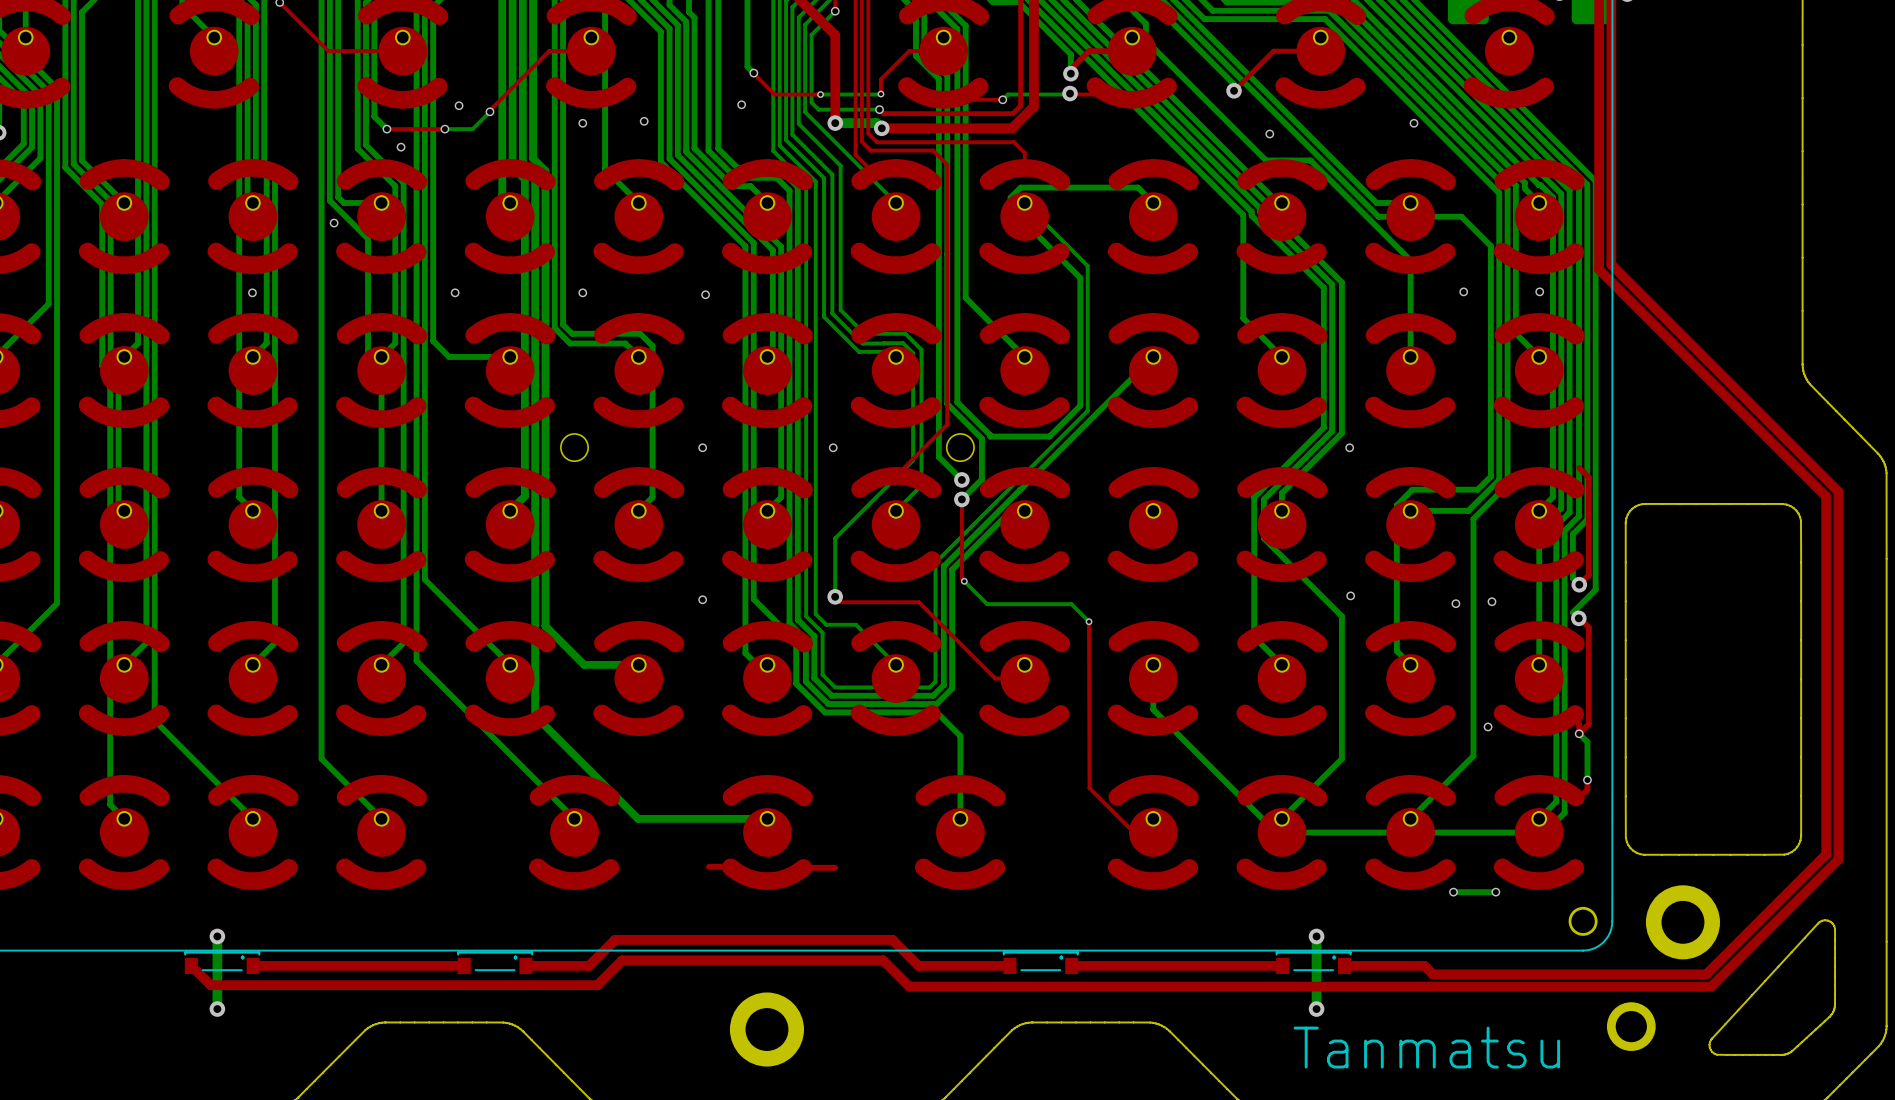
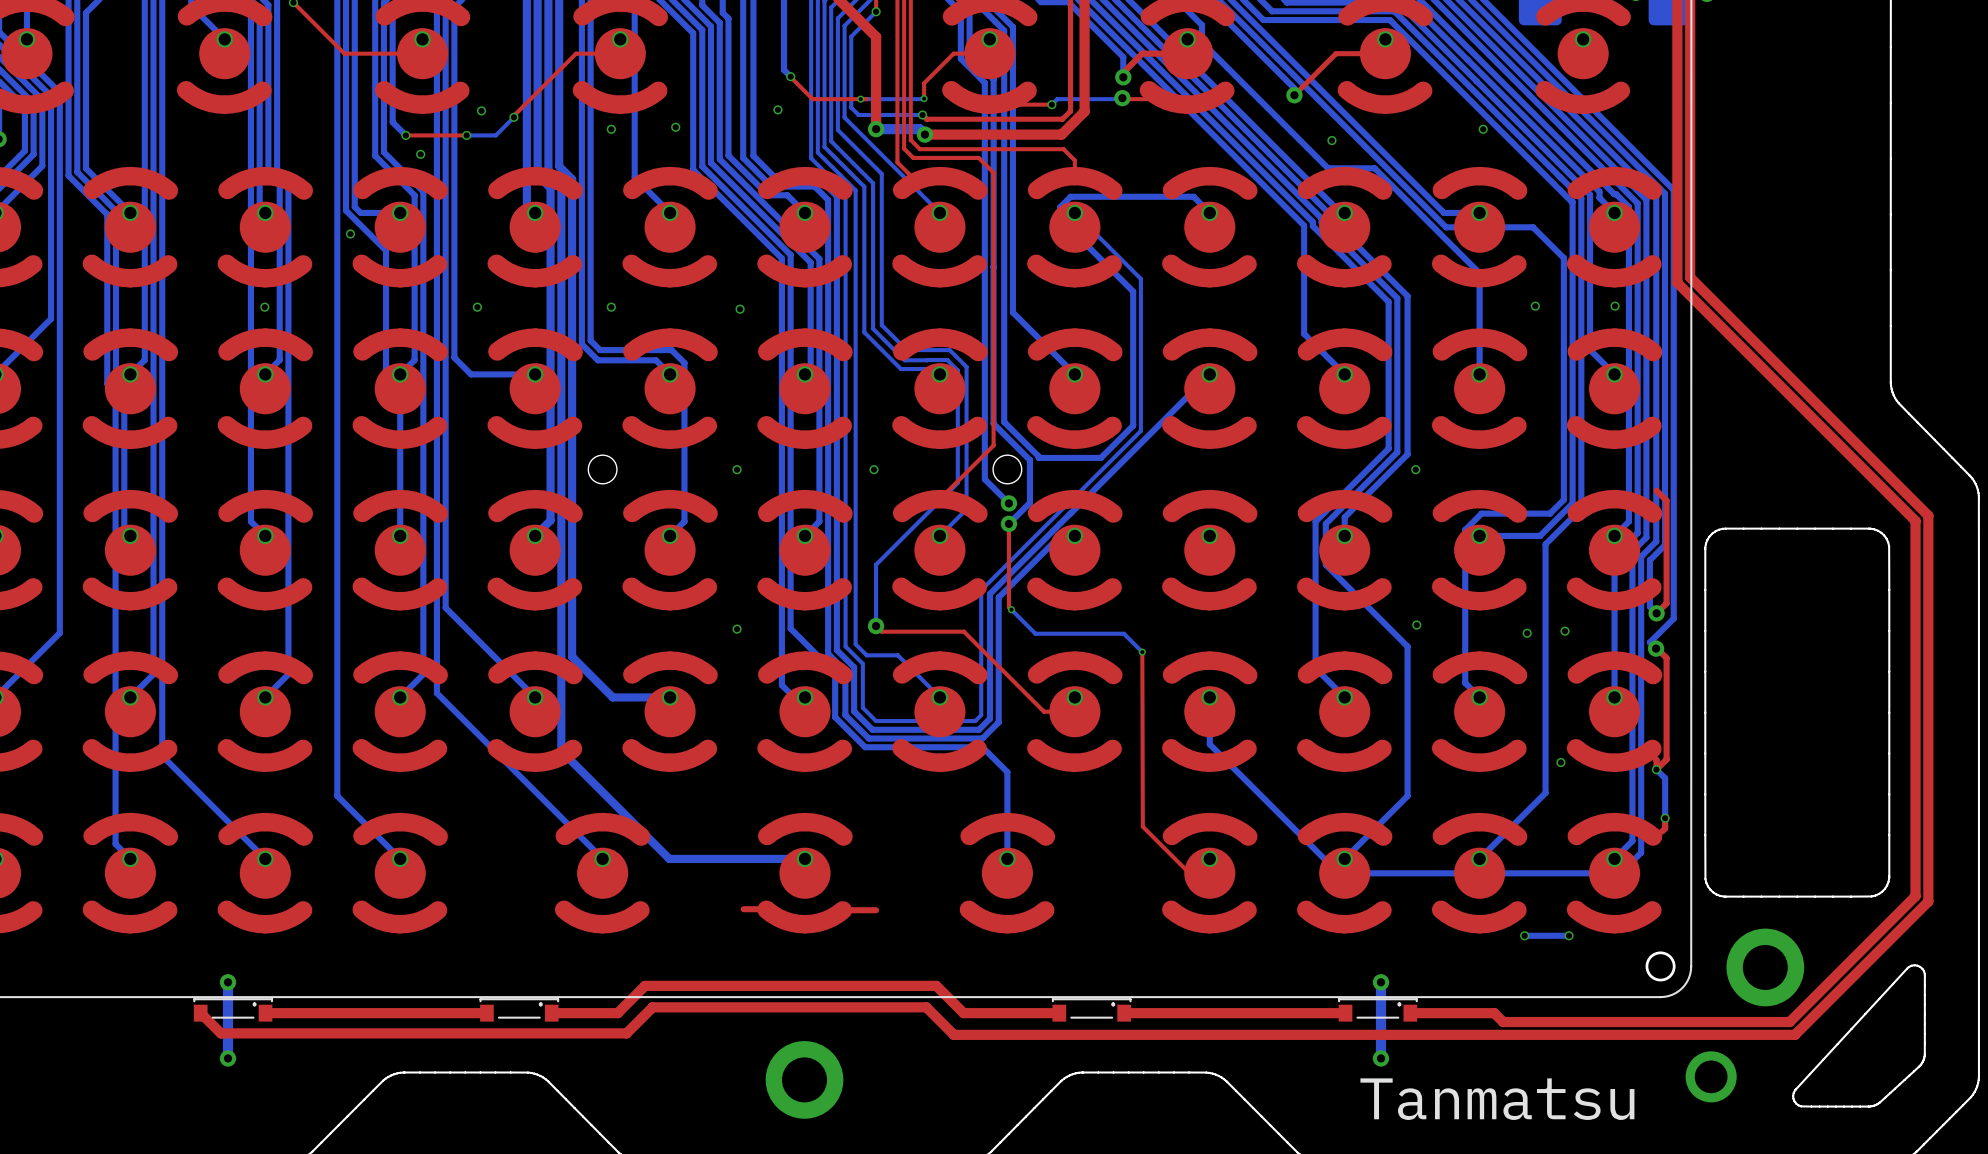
top track: none -> (860, 99) (866, 99)

